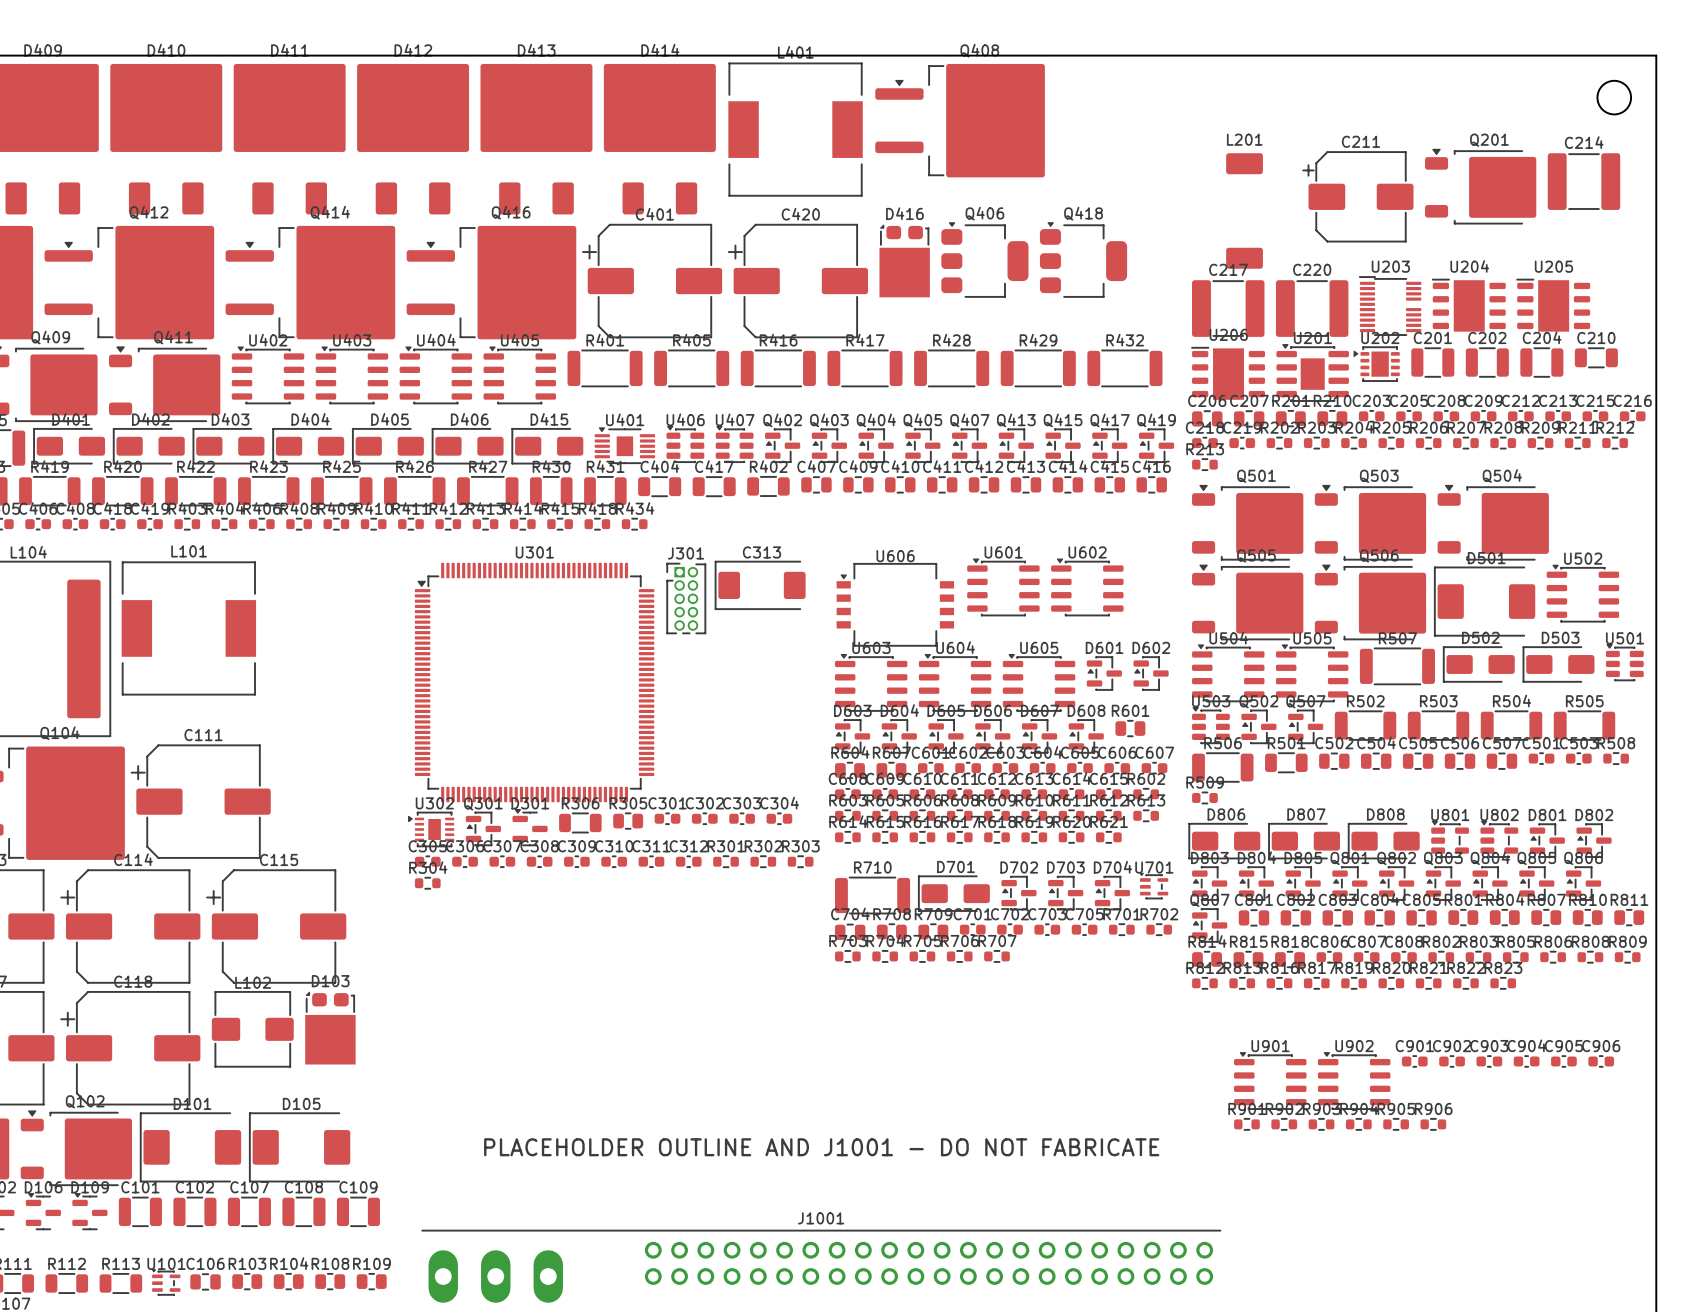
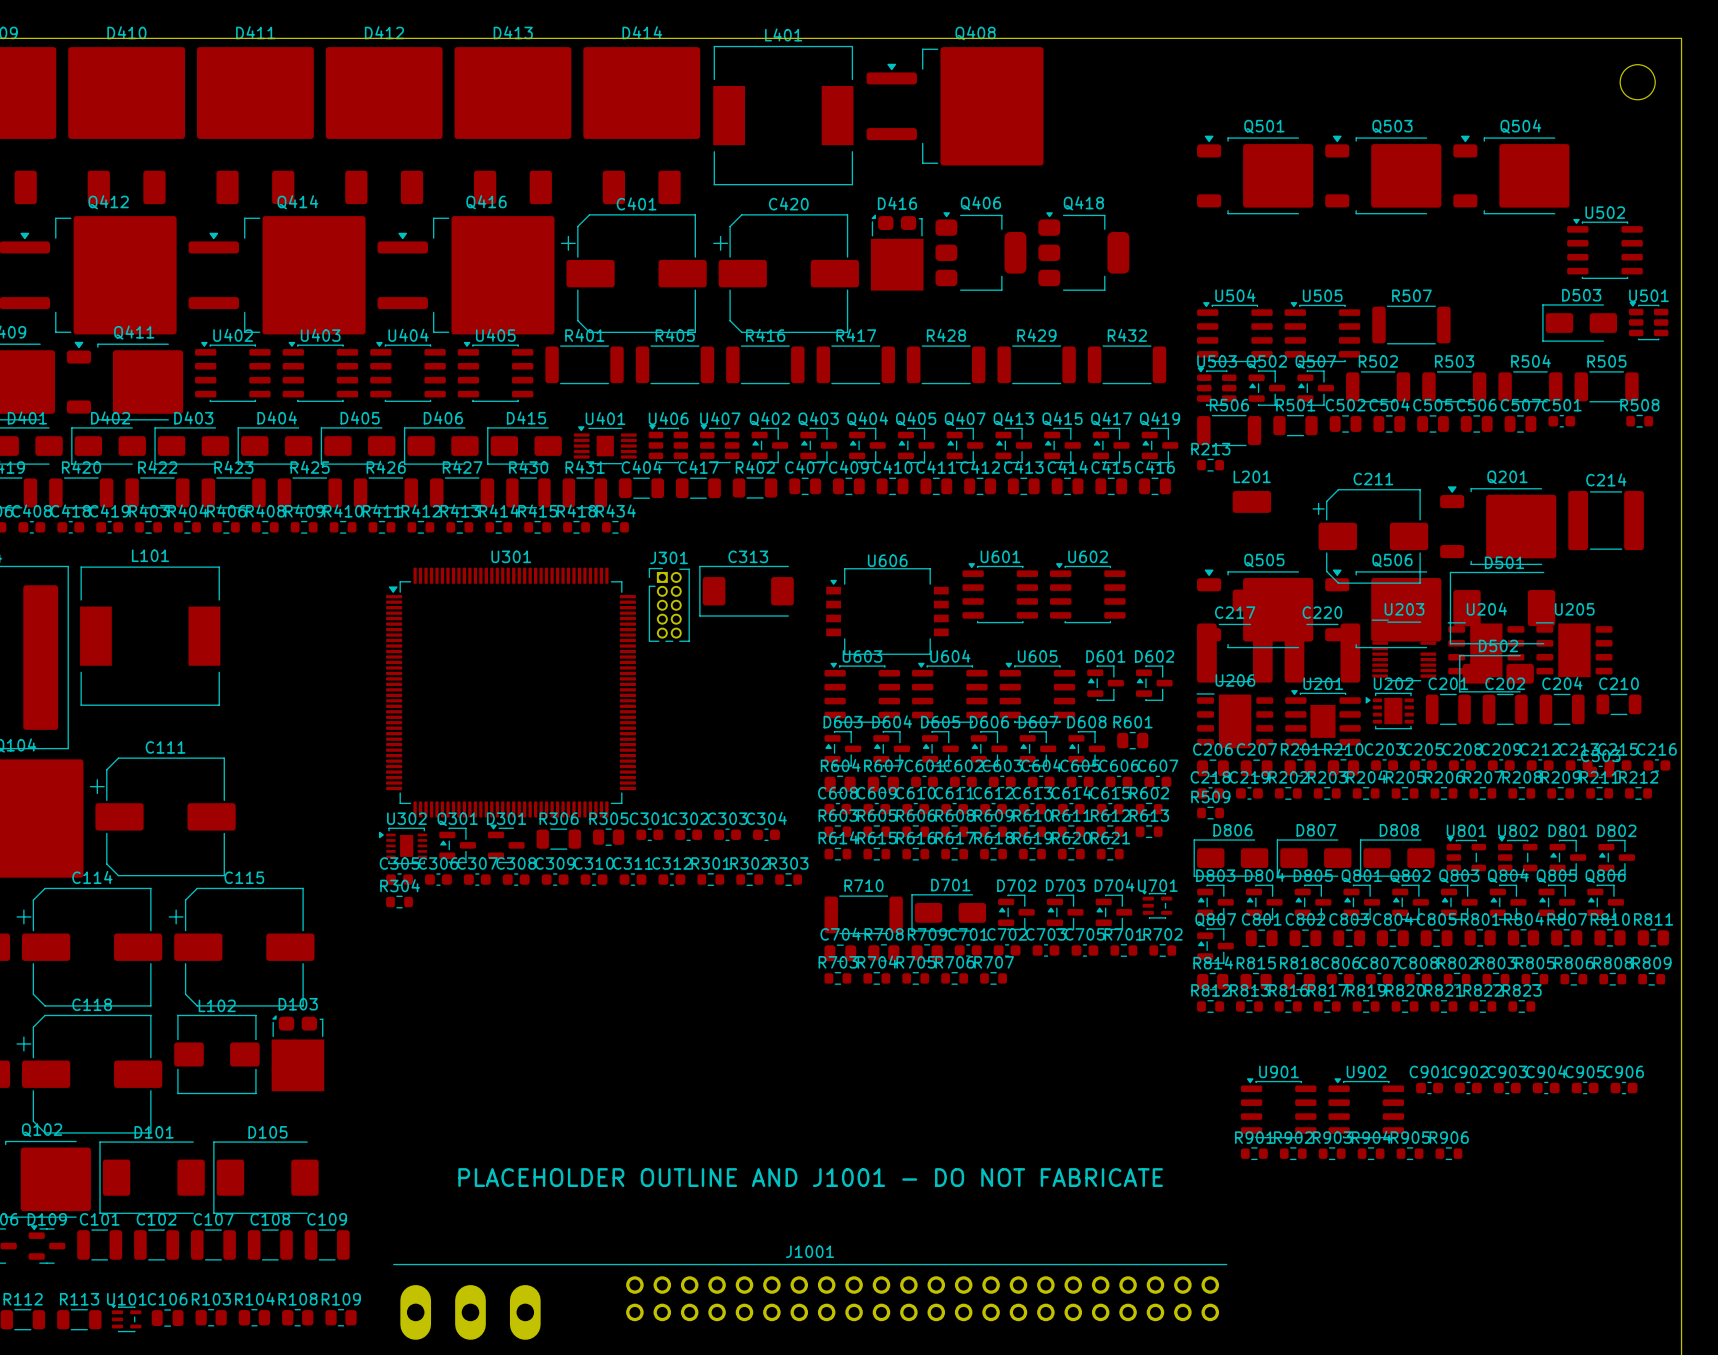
C214 position: (1583, 181) -> (1606, 520)
Q201 position: (1480, 186) -> (1498, 525)
C211 position: (1358, 196) -> (1370, 536)
L201 position: (1244, 210) -> (1251, 551)
U204 position: (1468, 305) -> (1486, 649)
U205 position: (1553, 305) -> (1574, 649)
U203 position: (1390, 306) -> (1403, 650)
C217 position: (1228, 308) -> (1234, 653)
C220 position: (1312, 308) -> (1322, 653)
C210 position: (1596, 357) -> (1619, 704)
C201 position: (1432, 362) -> (1448, 709)
C202 position: (1487, 362) -> (1505, 709)
C204 position: (1541, 362) -> (1562, 709)
U202 position: (1376, 364) -> (1389, 711)
U201 position: (1312, 372) -> (1322, 720)
U206 position: (1228, 373) -> (1234, 720)
C203 position: (1371, 416) -> (1384, 765)
C205 position: (1409, 416) -> (1423, 765)
C208 position: (1446, 416) -> (1462, 765)
C209 position: (1483, 416) -> (1501, 765)
C212 position: (1520, 416) -> (1540, 765)
C213 position: (1558, 416) -> (1579, 765)
C215 position: (1595, 416) -> (1618, 765)
C216 position: (1632, 416) -> (1656, 765)
C206 position: (1207, 418) -> (1212, 768)
C207 position: (1249, 418) -> (1256, 768)
R201 position: (1290, 418) -> (1300, 767)
R210 position: (1332, 418) -> (1343, 767)
C218 position: (1204, 443) -> (1210, 793)
C219 position: (1242, 443) -> (1249, 793)
R202 position: (1279, 443) -> (1288, 793)
R203 position: (1316, 443) -> (1327, 793)
R204 position: (1354, 443) -> (1366, 793)
R205 position: (1391, 443) -> (1405, 793)
R206 position: (1428, 443) -> (1443, 793)
R207 position: (1465, 443) -> (1482, 793)
R208 position: (1503, 443) -> (1521, 793)
R209 position: (1540, 443) -> (1560, 793)
R211 position: (1577, 443) -> (1599, 793)
R212 position: (1615, 443) -> (1638, 793)
Q501 position: (1247, 522) -> (1255, 174)
Q503 position: (1370, 522) -> (1383, 174)
Q504 position: (1493, 522) -> (1511, 174)
U502 position: (1582, 593) -> (1604, 248)
U501 position: (1624, 662) -> (1648, 320)
D503 position: (1558, 664) -> (1579, 323)
R507 position: (1397, 666) -> (1411, 325)
U504 position: (1228, 673) -> (1234, 332)
U505 position: (1312, 673) -> (1322, 332)
U503 position: (1210, 725) -> (1216, 386)
R502 position: (1365, 725) -> (1378, 386)
R503 position: (1438, 725) -> (1454, 386)
R504 position: (1511, 725) -> (1530, 386)
R505 position: (1584, 725) -> (1606, 386)
Q502 position: (1258, 726) -> (1266, 388)
Q507 position: (1305, 726) -> (1315, 388)
C501 position: (1541, 758) -> (1561, 421)
R508 position: (1616, 758) -> (1639, 421)
C502 position: (1334, 761) -> (1345, 423)
C504 position: (1376, 761) -> (1389, 423)
C505 position: (1418, 761) -> (1433, 423)
C506 position: (1460, 761) -> (1476, 423)
C507 position: (1501, 761) -> (1520, 423)
R501 position: (1286, 762) -> (1295, 425)
R506 position: (1222, 767) -> (1229, 430)

